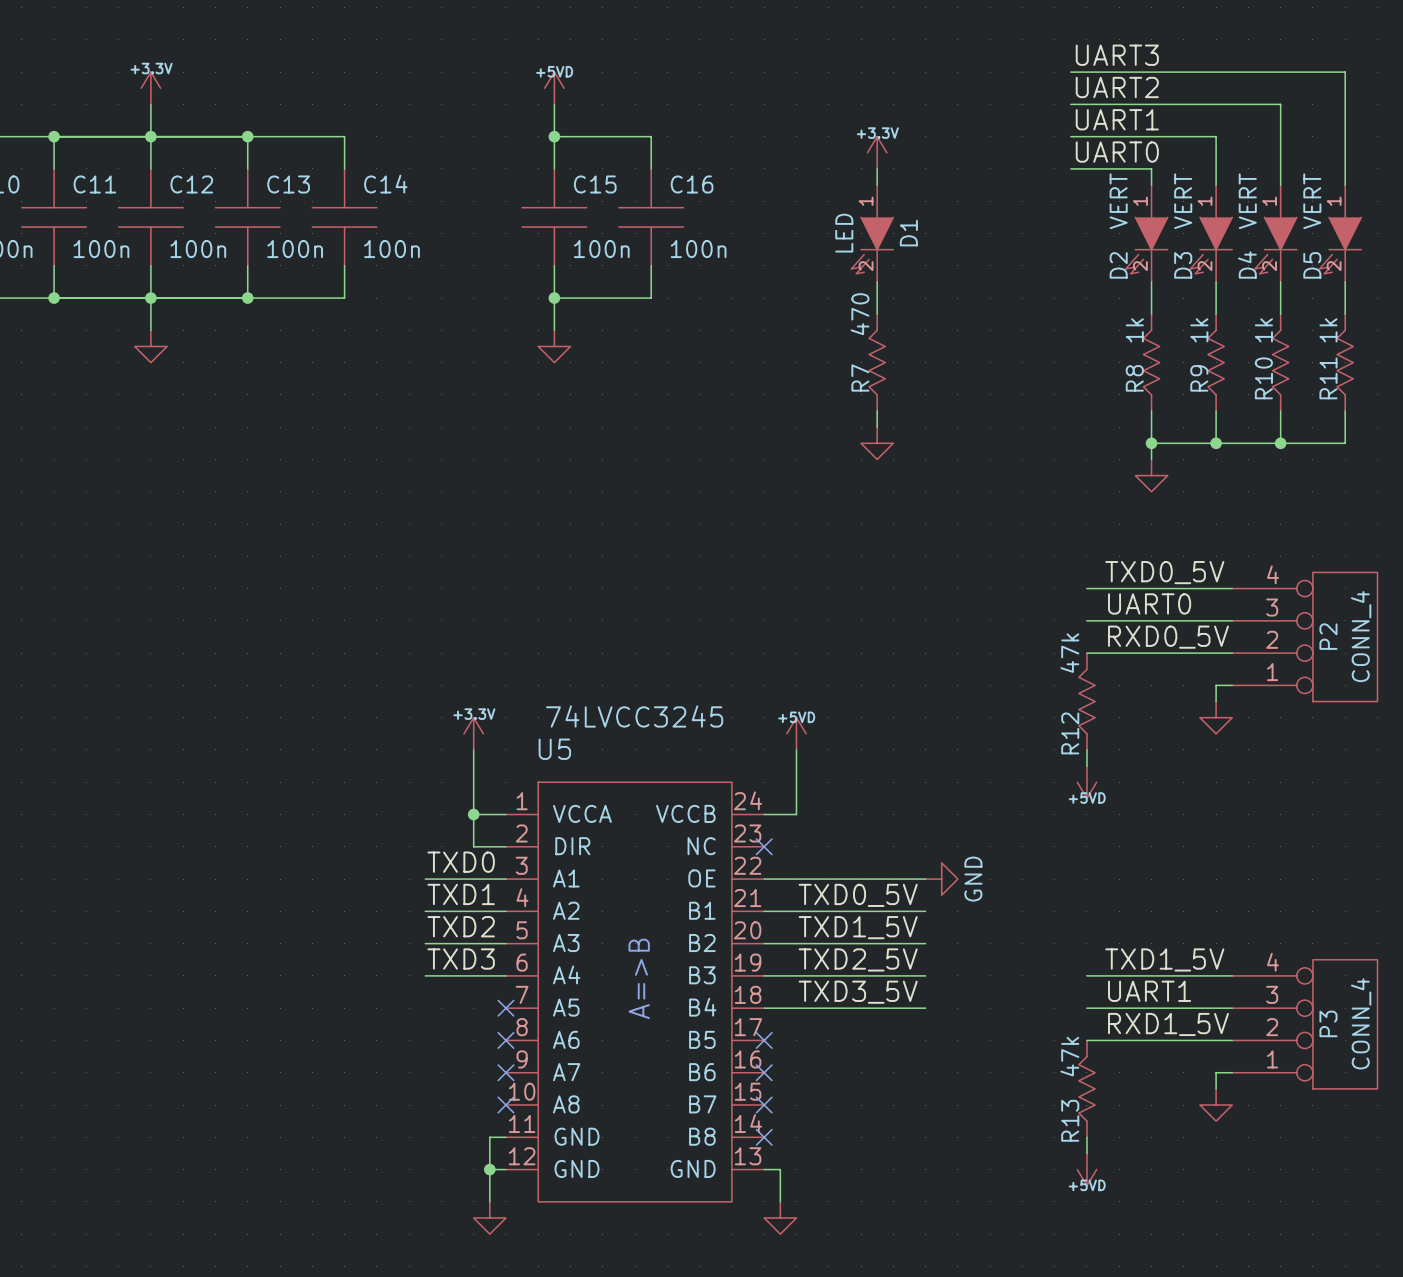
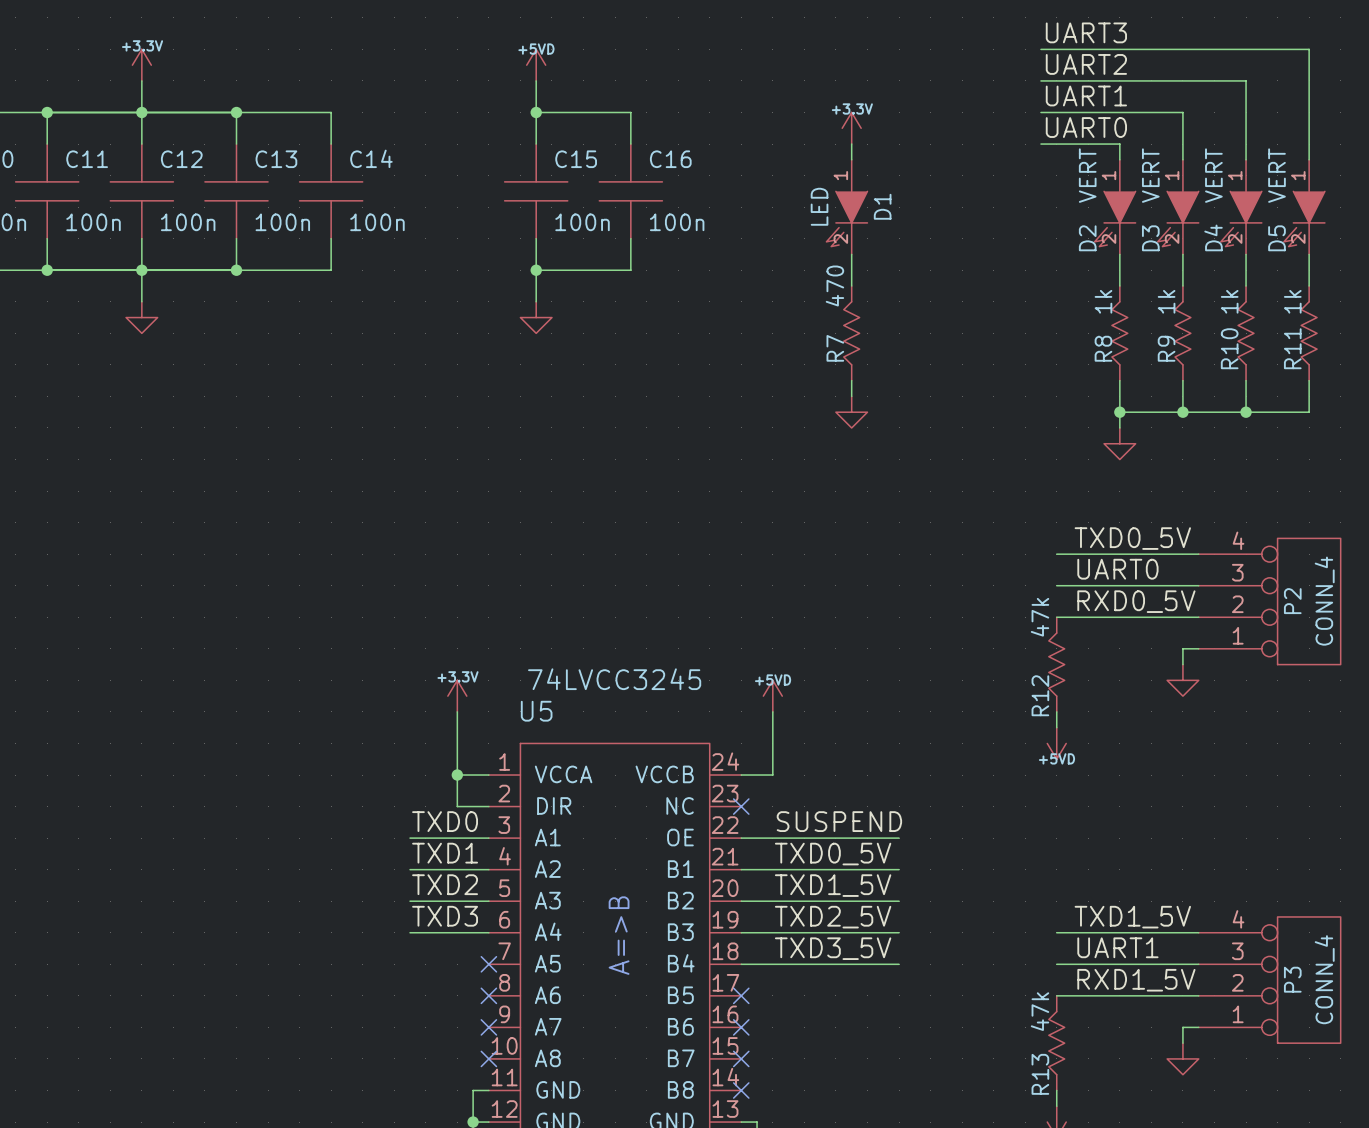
label: none -> SUSPEND (839, 821)
power symbol: GND (941, 879) -> none

